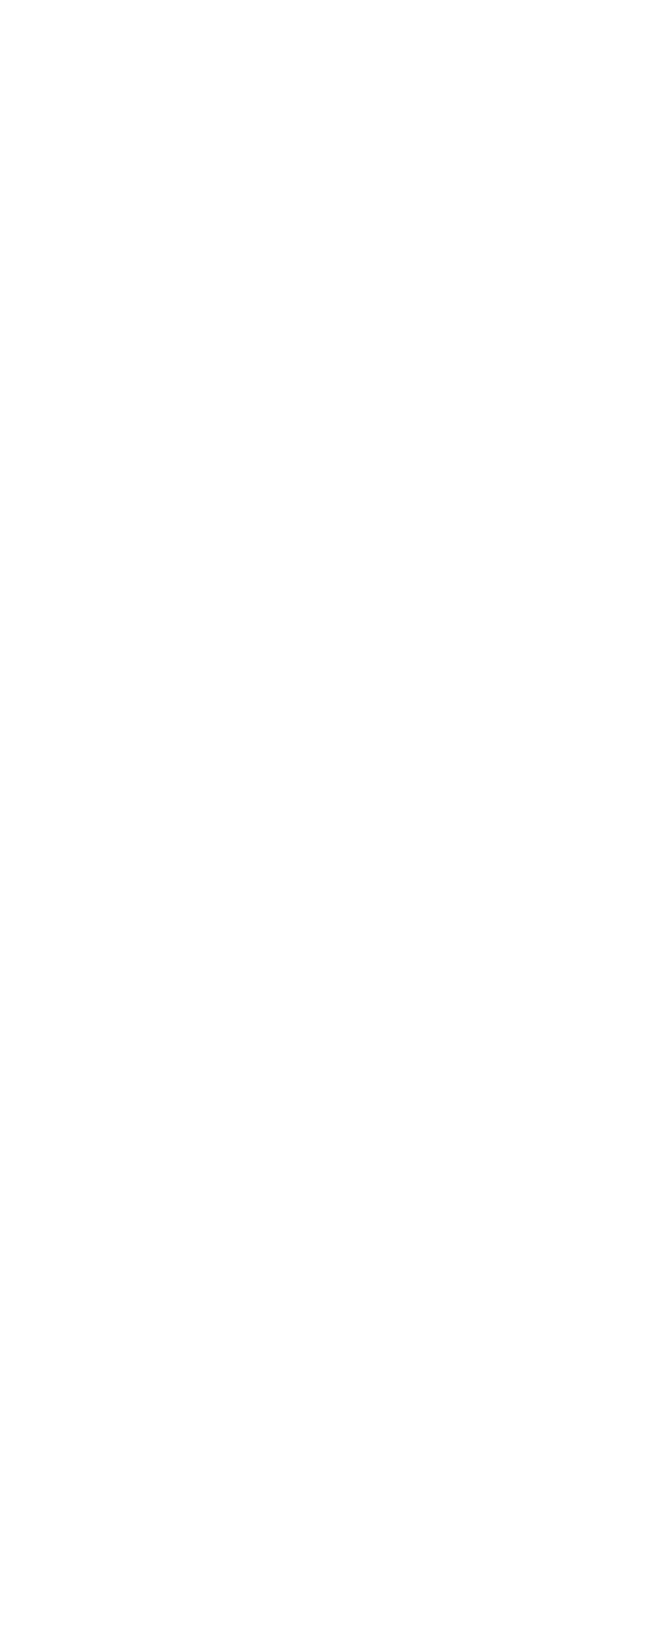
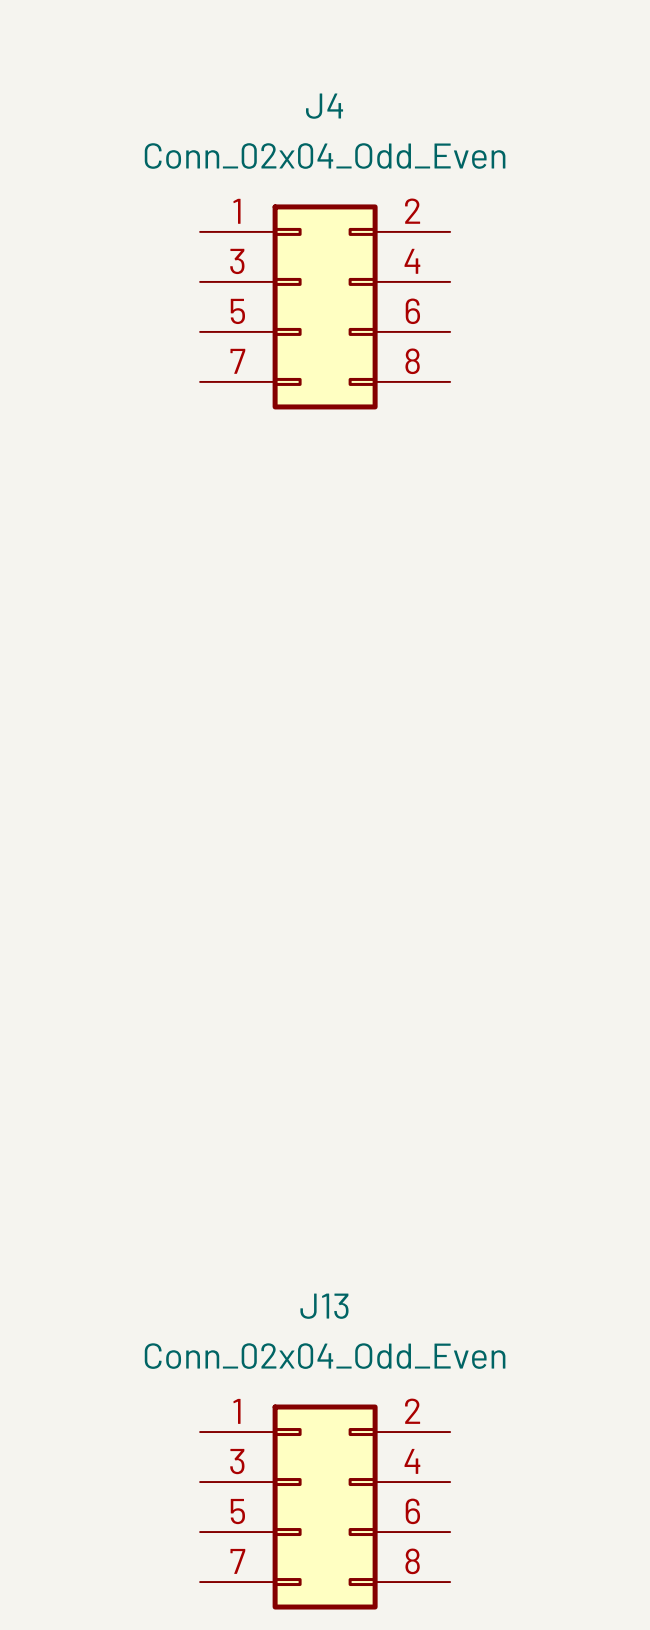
J4: none -> Conn_02x04_Odd_Even (325, 306)
J13: none -> Conn_02x04_Odd_Even (325, 1507)

